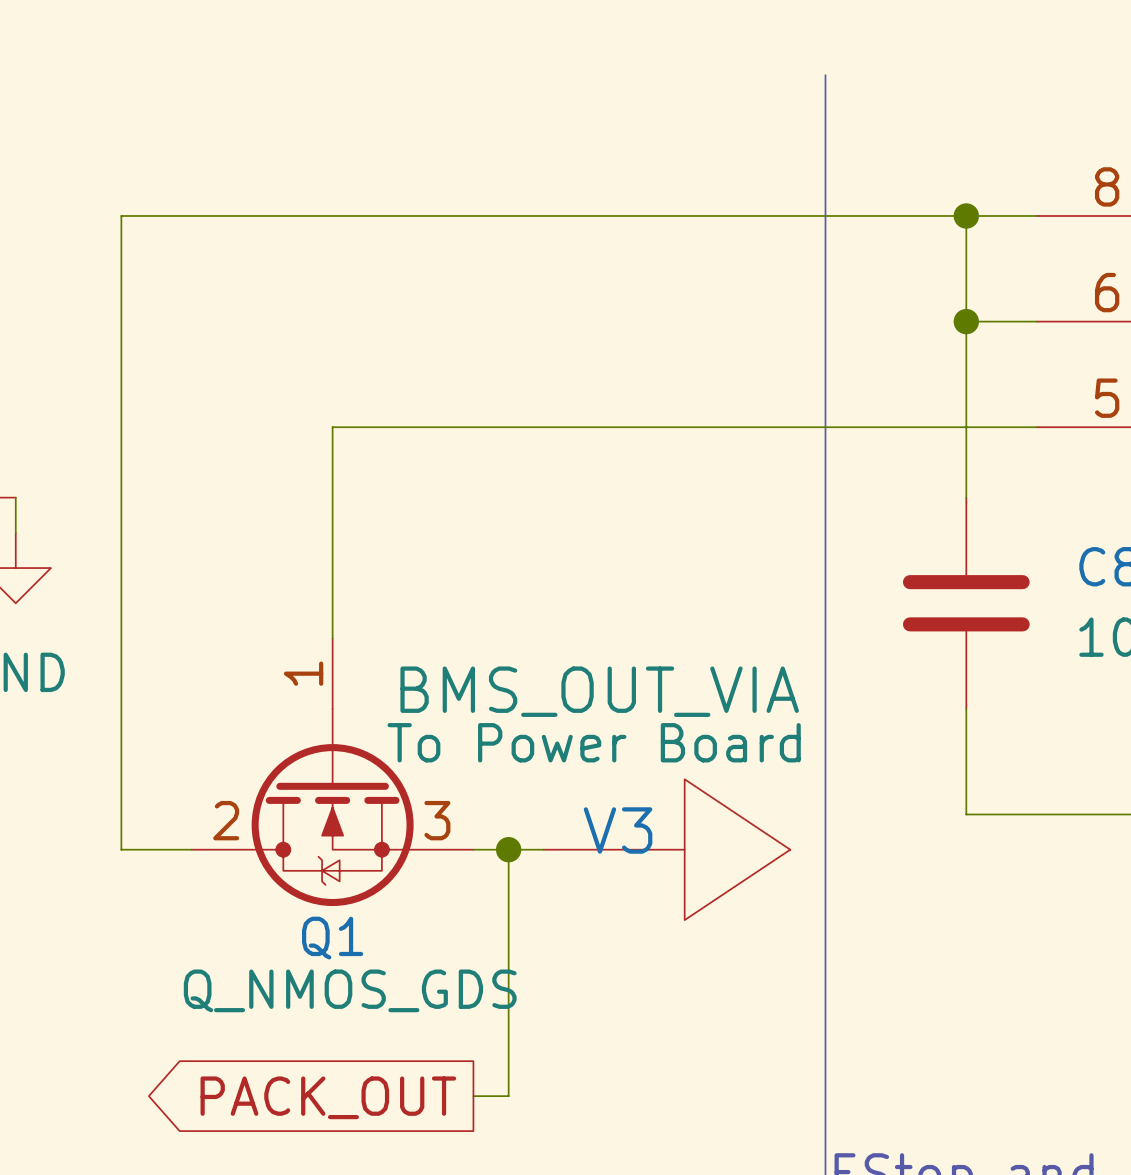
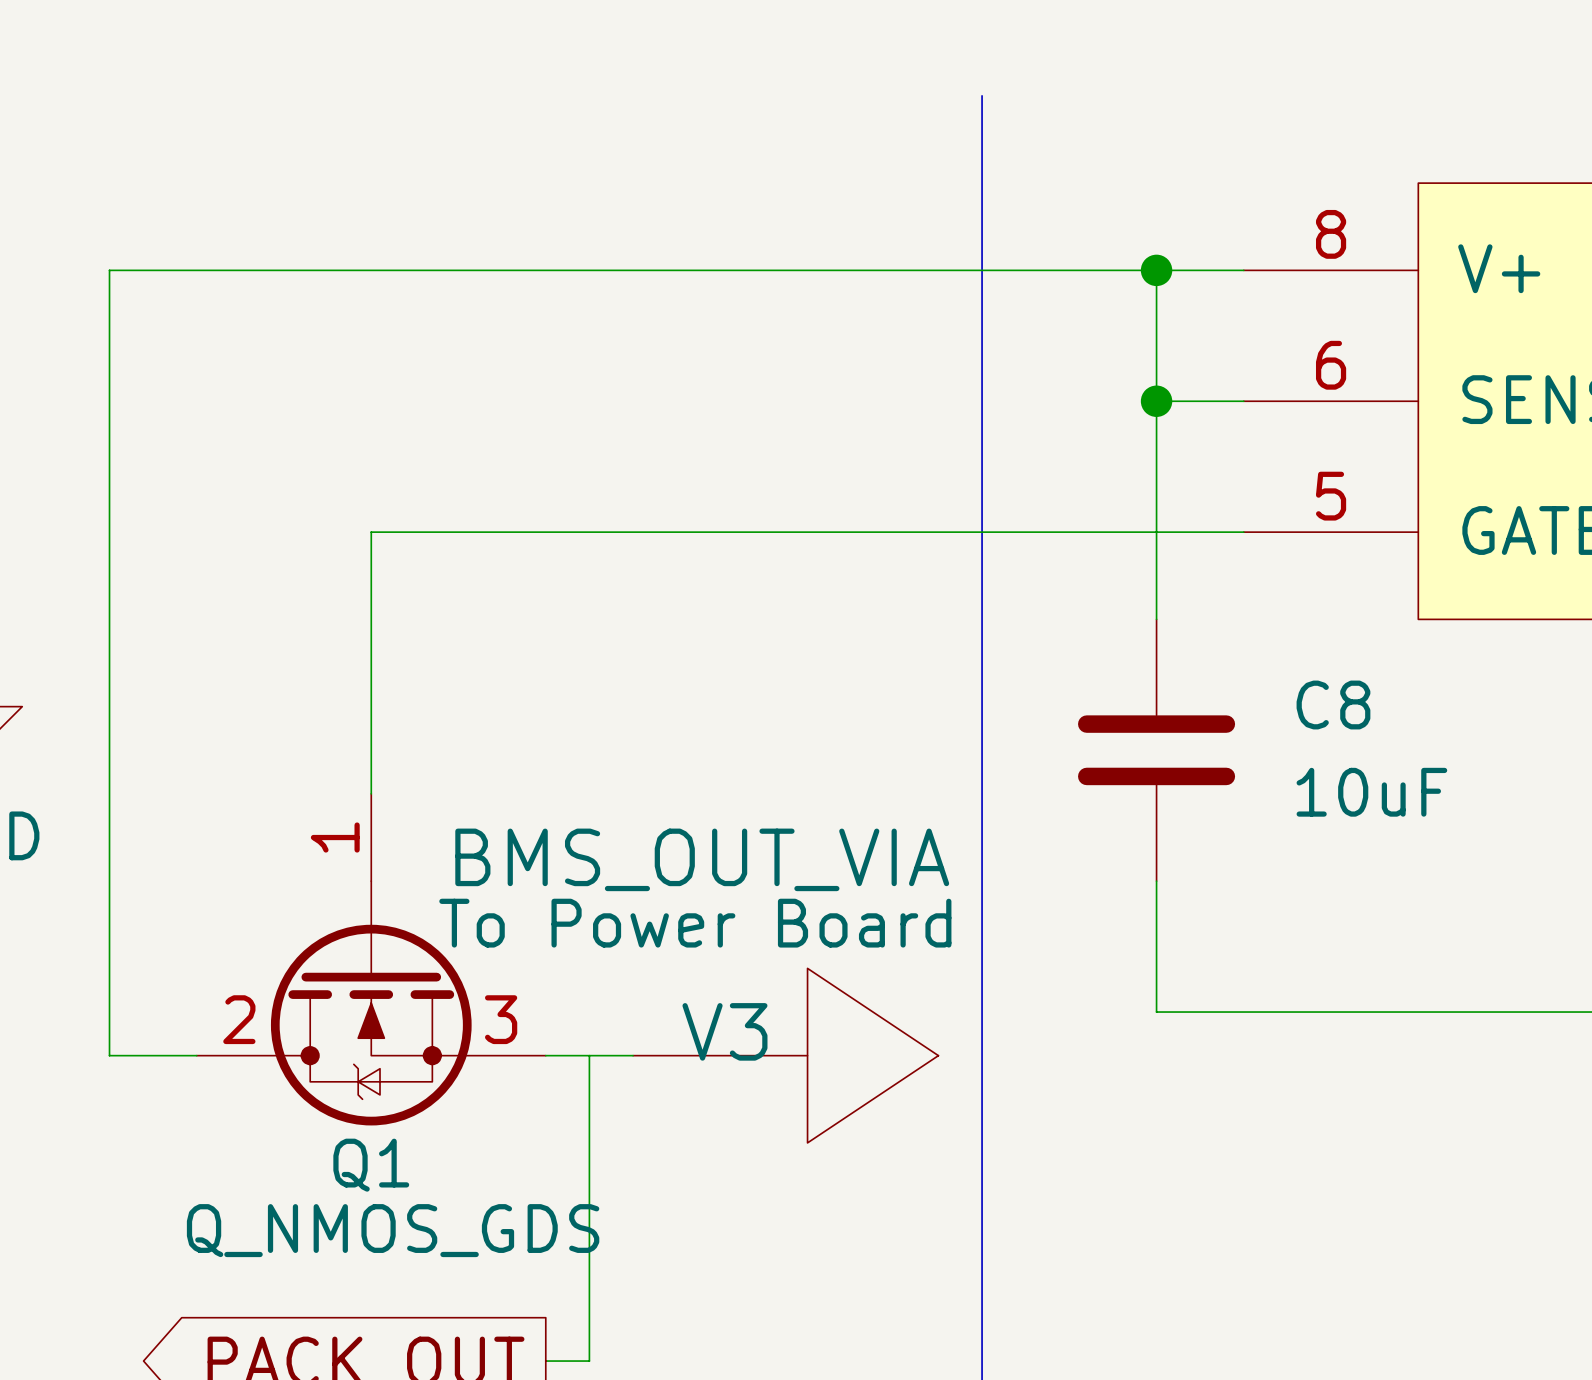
junction: (508, 849) -> none

